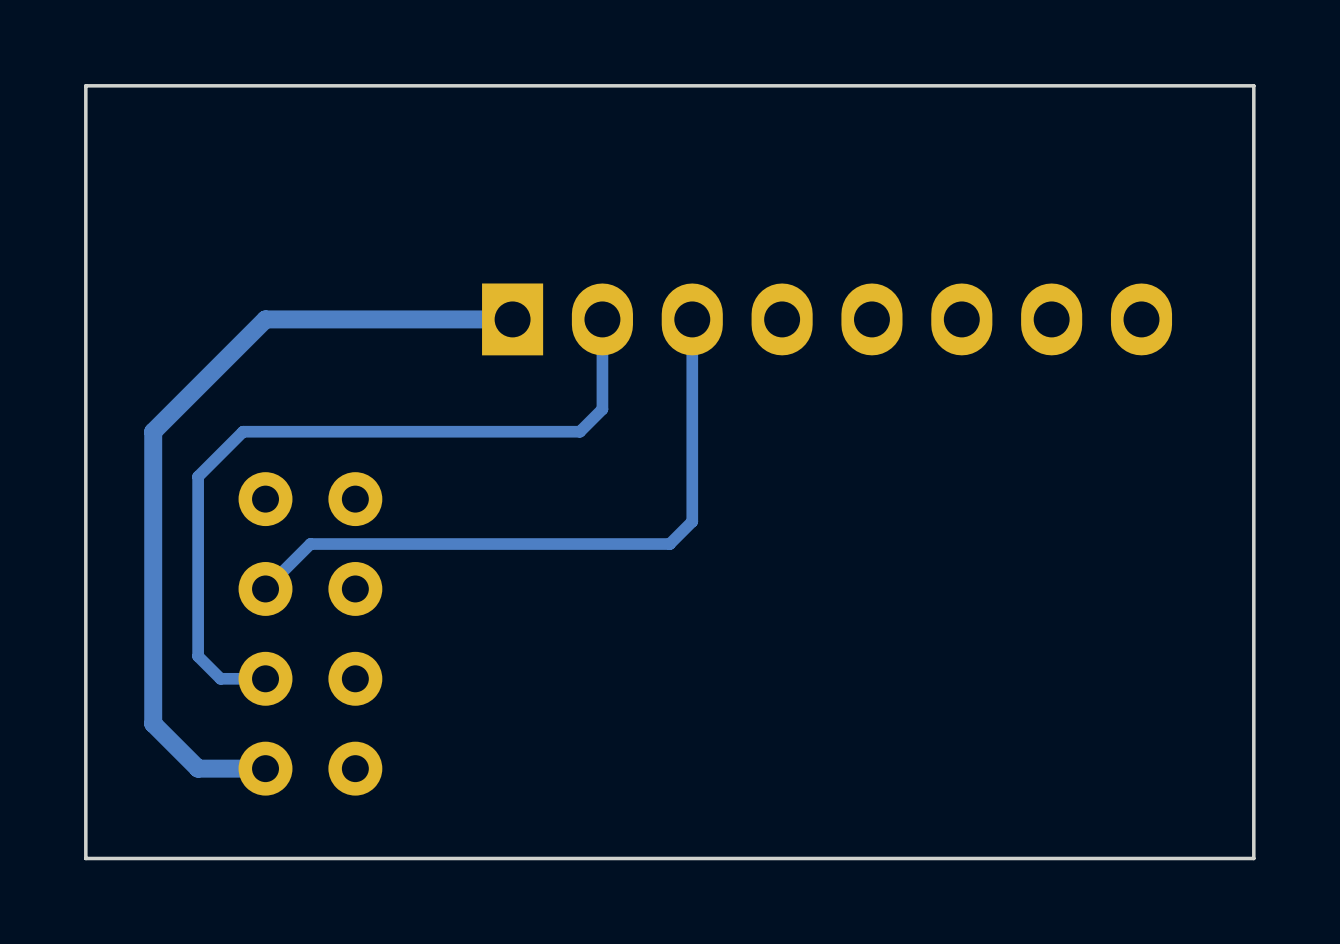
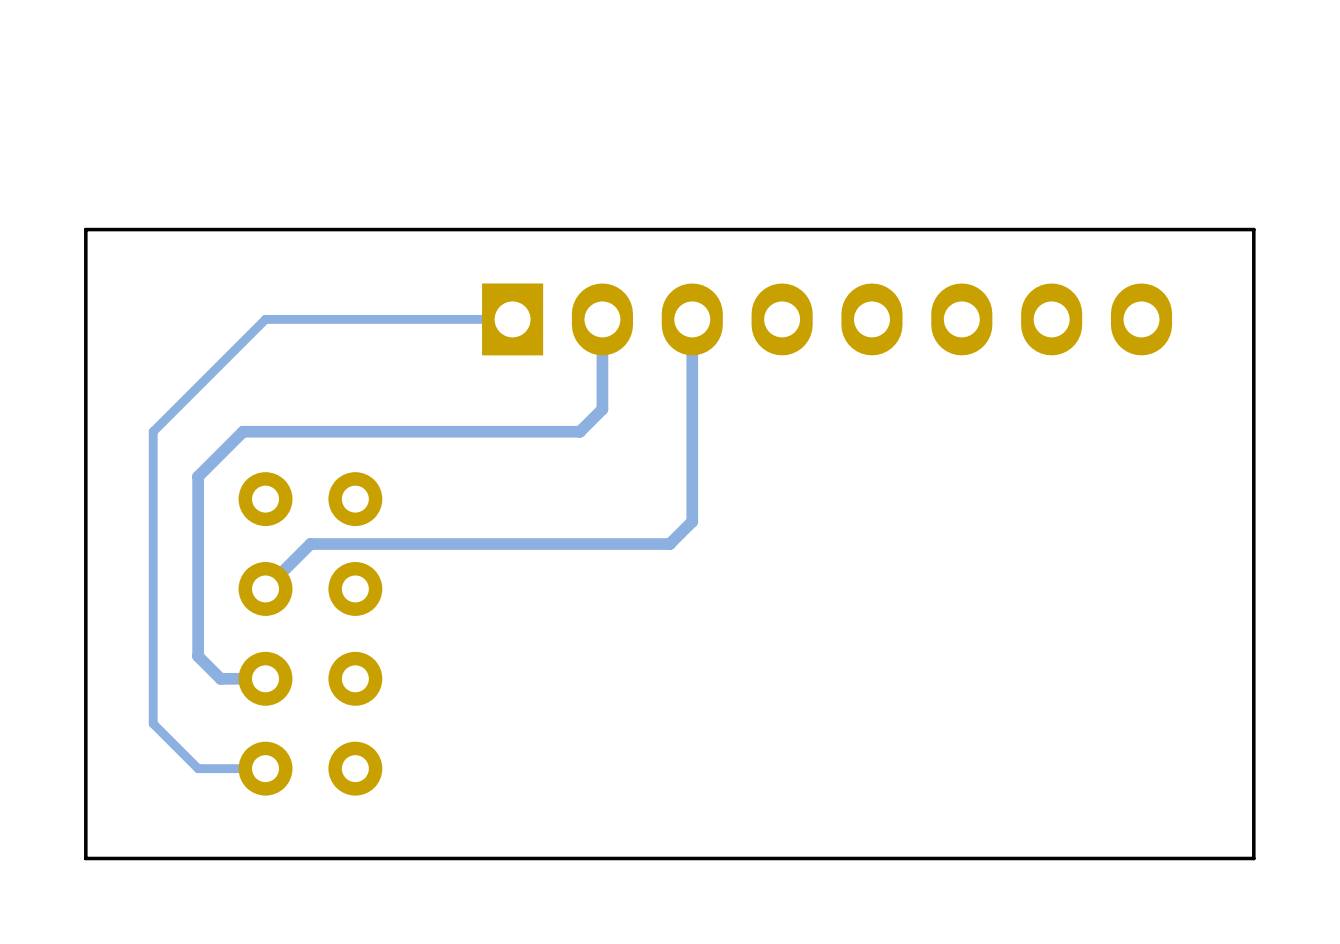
board edge: (1253, 229) (1253, 85) (85, 85) (85, 229) -> (1253, 229) (85, 229)
track width: thick (512, 319) (265, 319) (153, 431) (153, 723) (198, 768) (265, 768) -> thin (512, 319) (265, 319) (153, 431) (153, 723) (198, 768) (265, 768)

